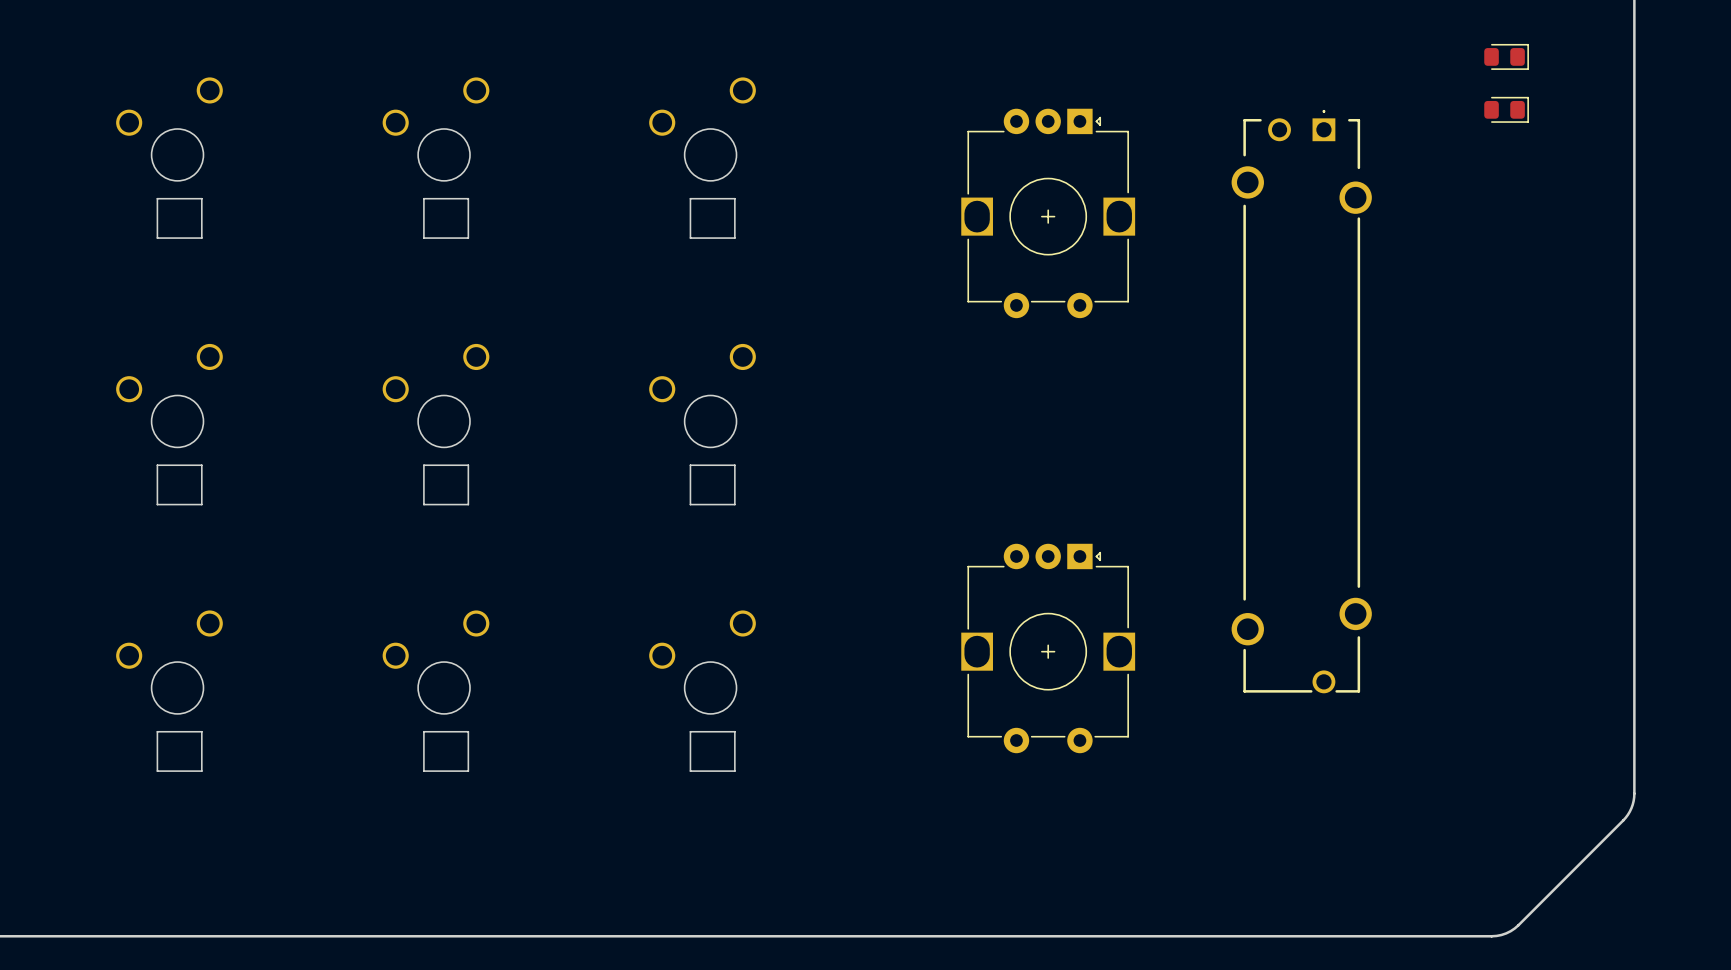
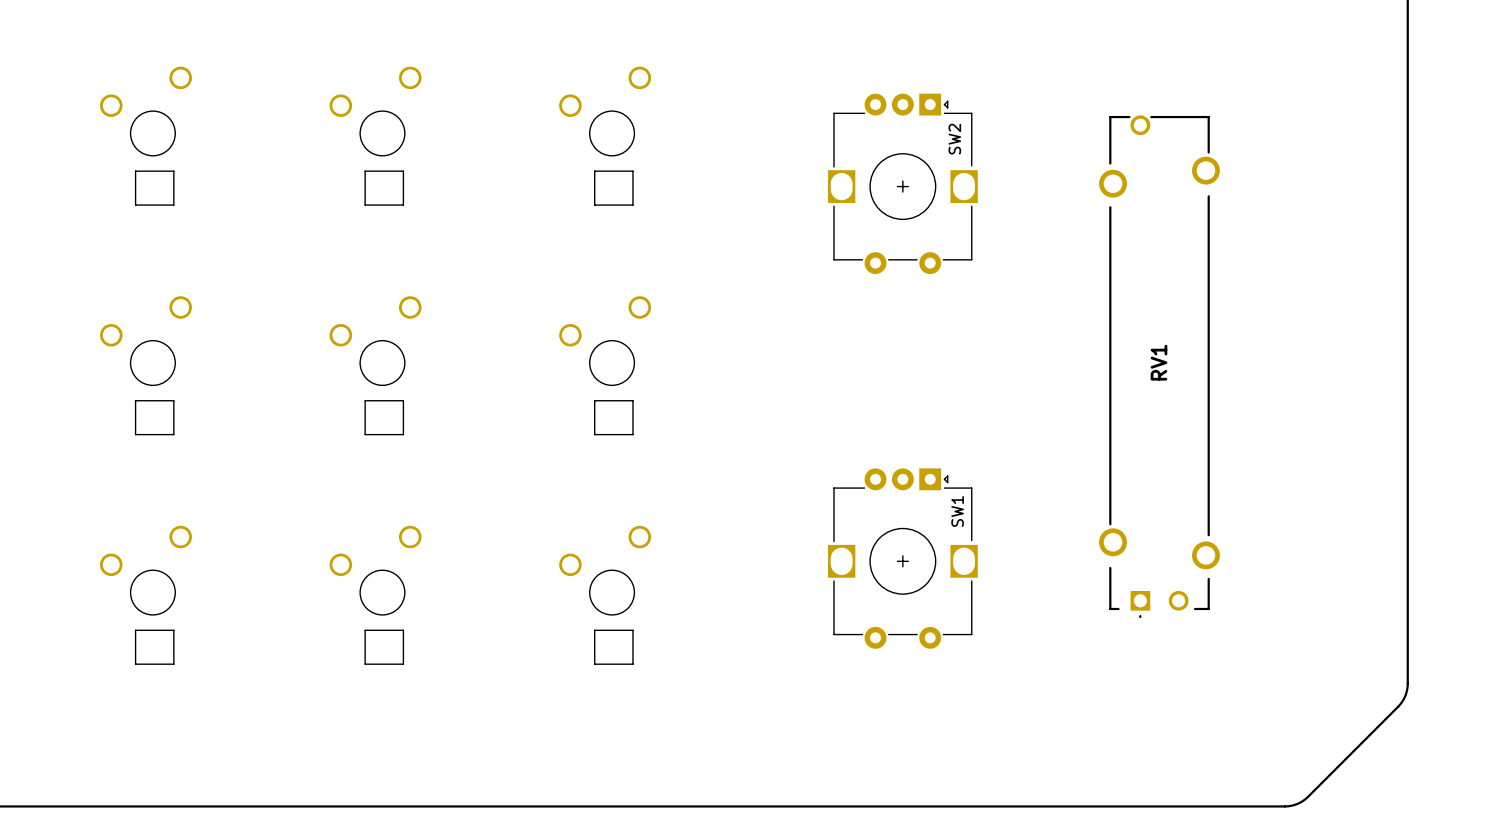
part: (1506, 56) -> none
part: (1506, 109) -> none
SW2 name: none -> SW2 (954, 139)
part: (1301, 401) -> none
RV1: none -> (1159, 366)
SW1 name: none -> SW1 (957, 511)

